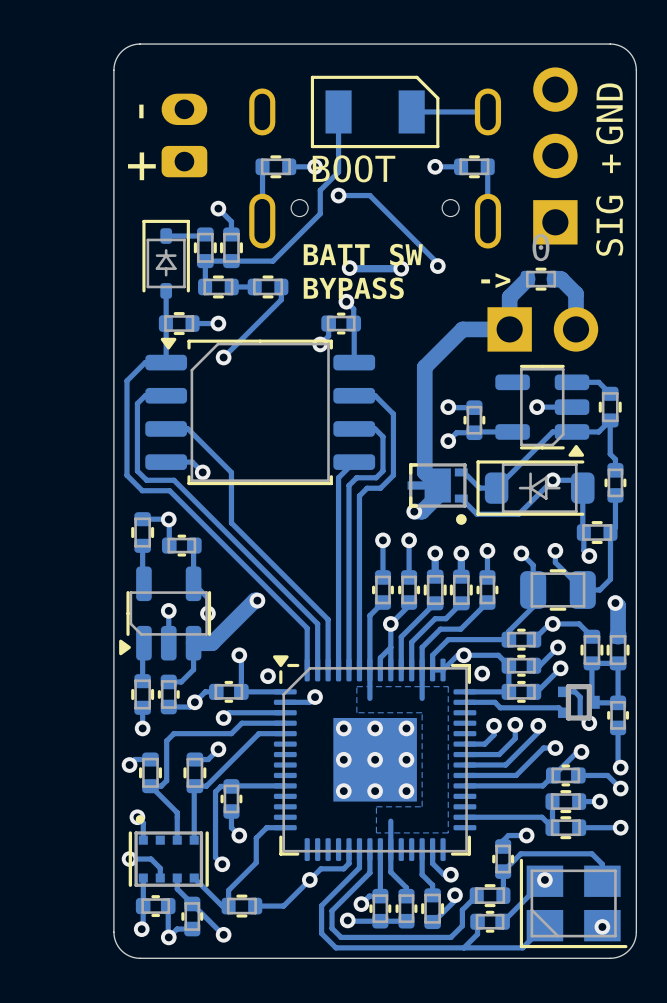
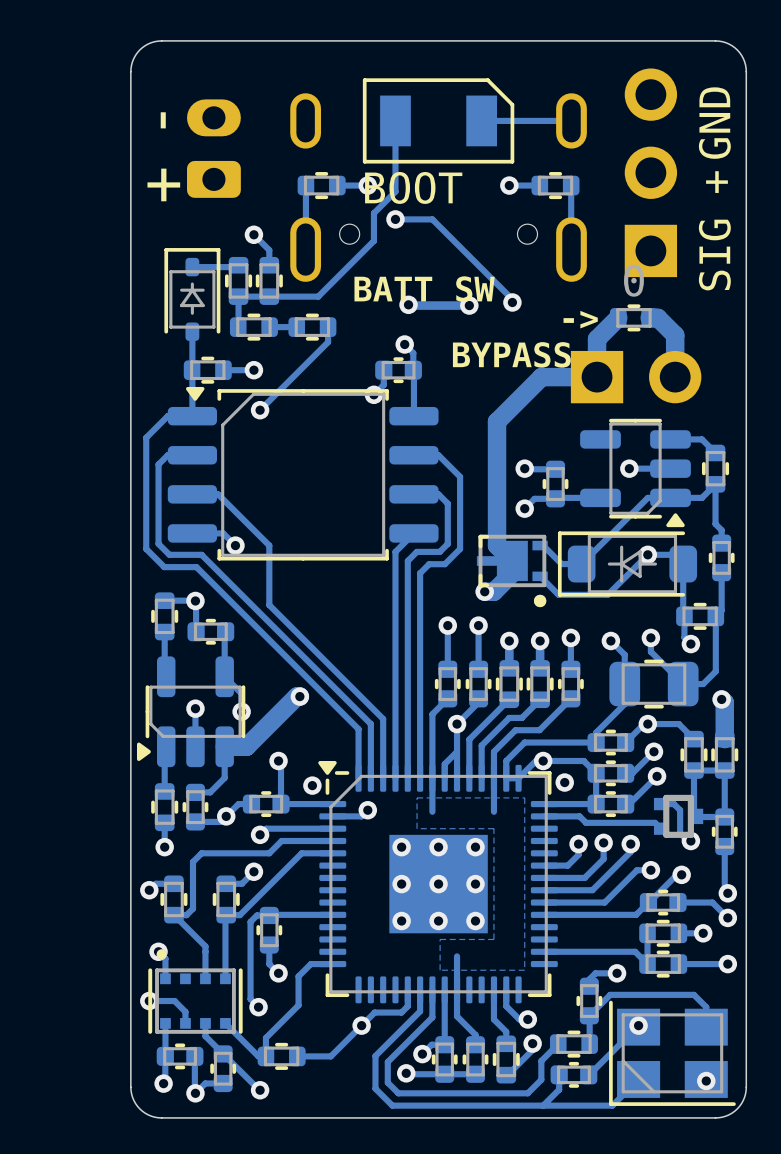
text position: BYPASS (353, 288) -> BYPASS (511, 354)

